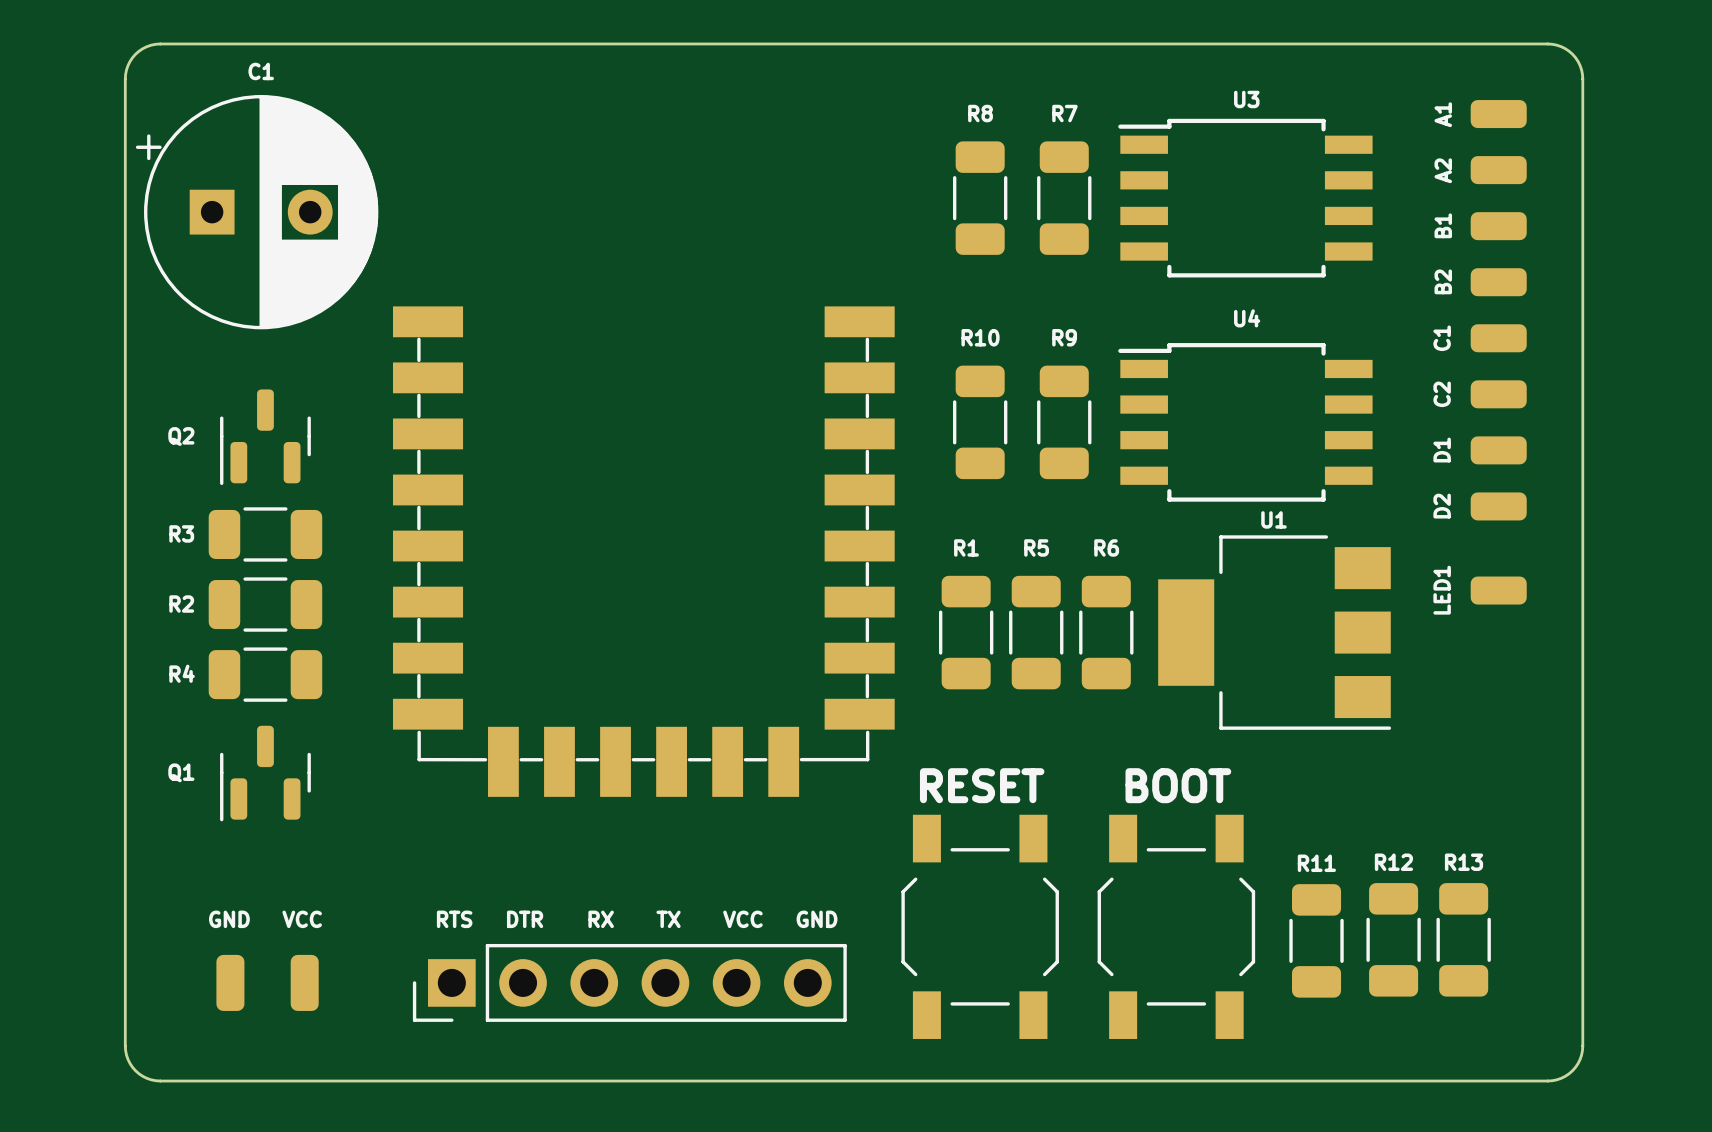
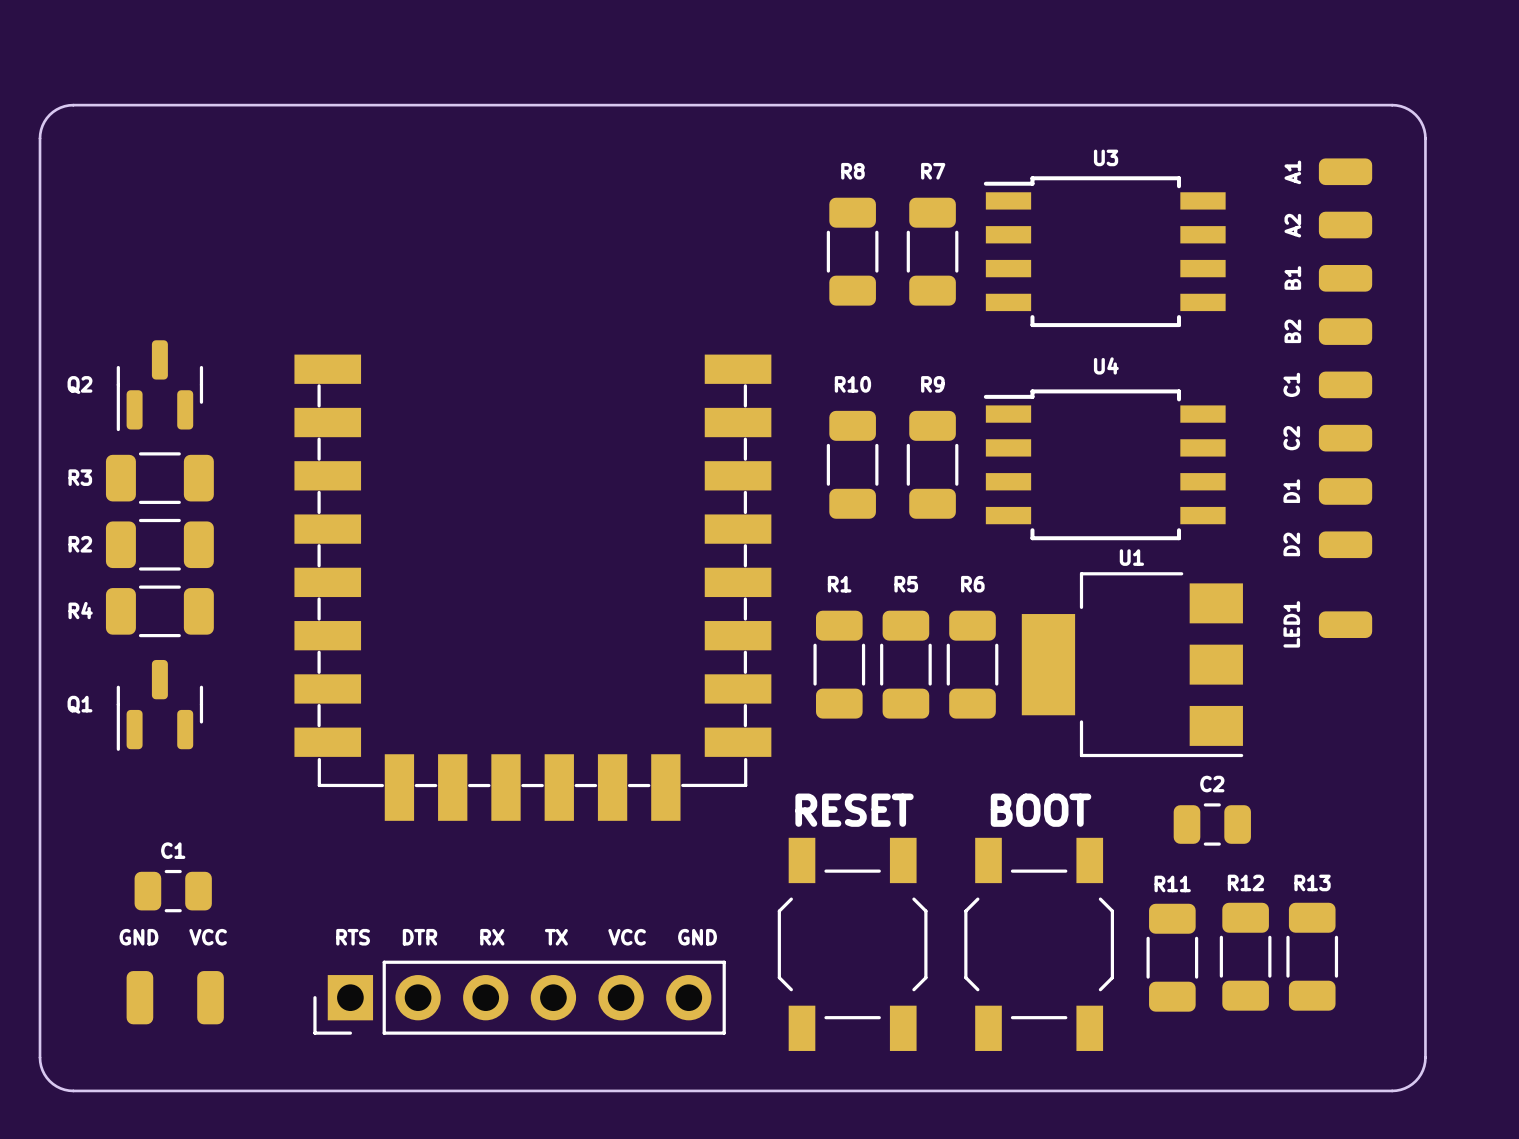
C1 name position: C1 (261, 71) -> C1 (173, 850)
C1 footprint: [135, 94, 379, 330] -> [134, 869, 212, 913]
Q2 position: (265, 437) -> (159, 385)
R3 position: (265, 534) -> (159, 478)
R2 position: (265, 604) -> (159, 544)
R4 position: (265, 674) -> (159, 611)
Q1 position: (265, 773) -> (159, 705)
C2: none -> (1212, 824)

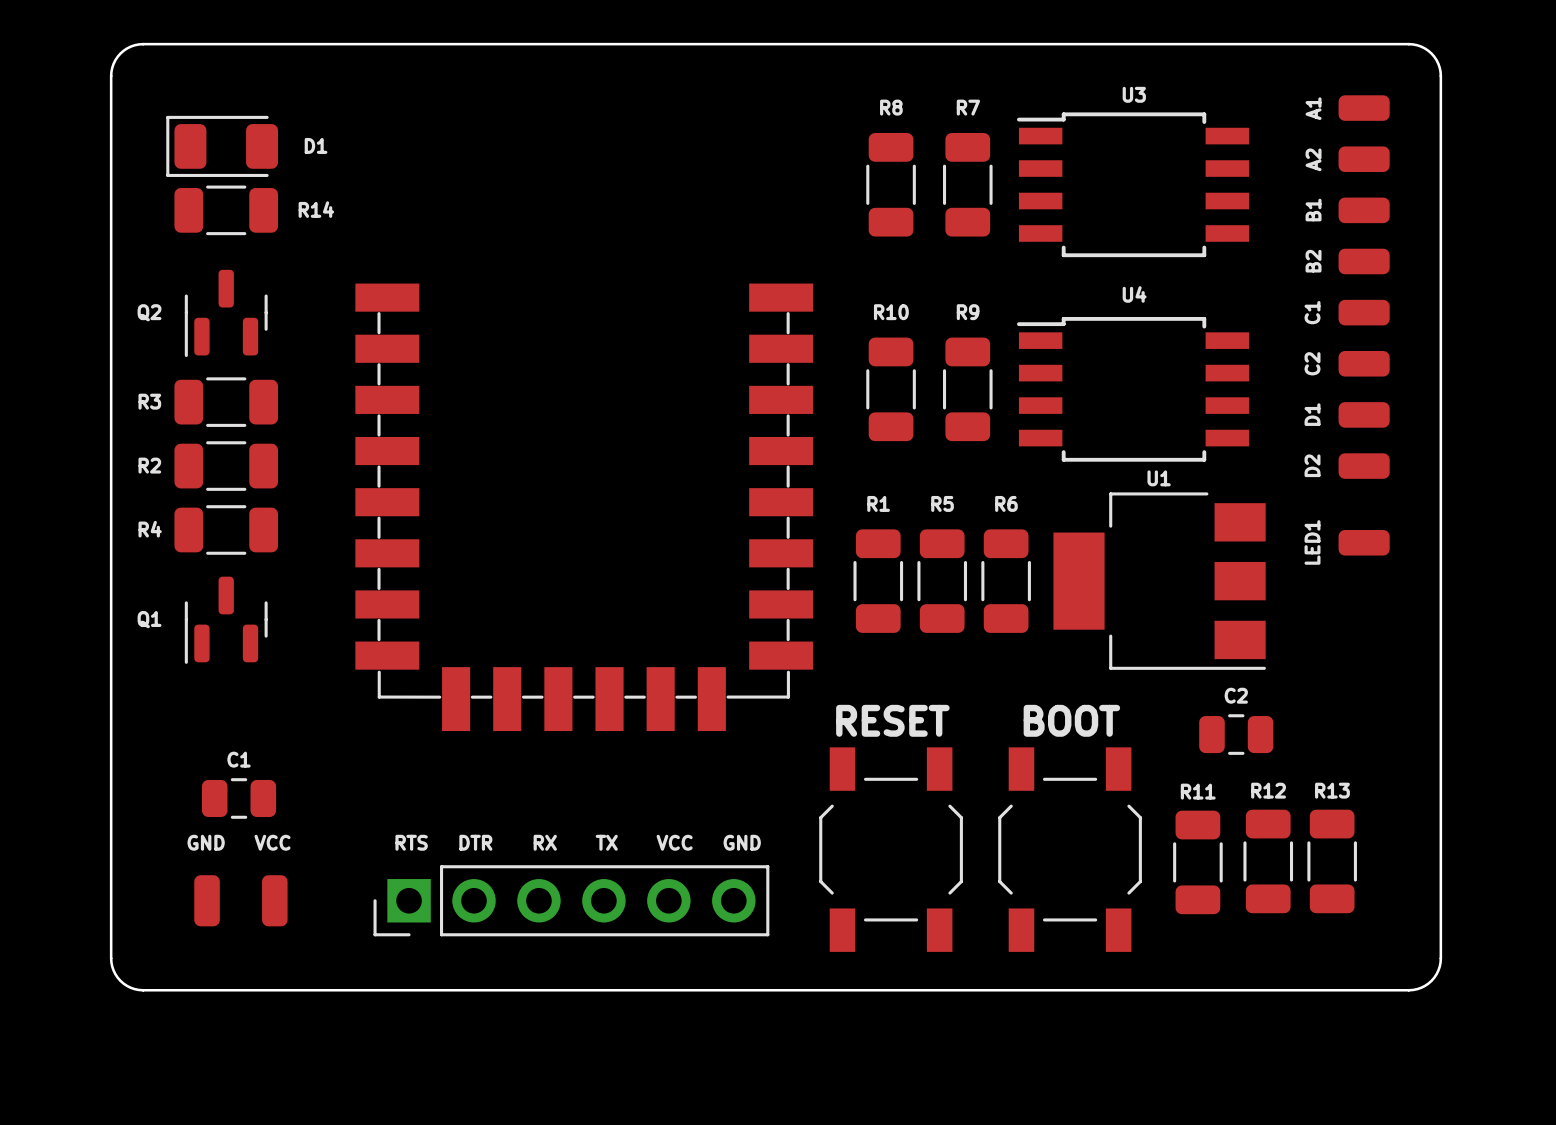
D1: none -> (222, 146)
R14: none -> (226, 210)

